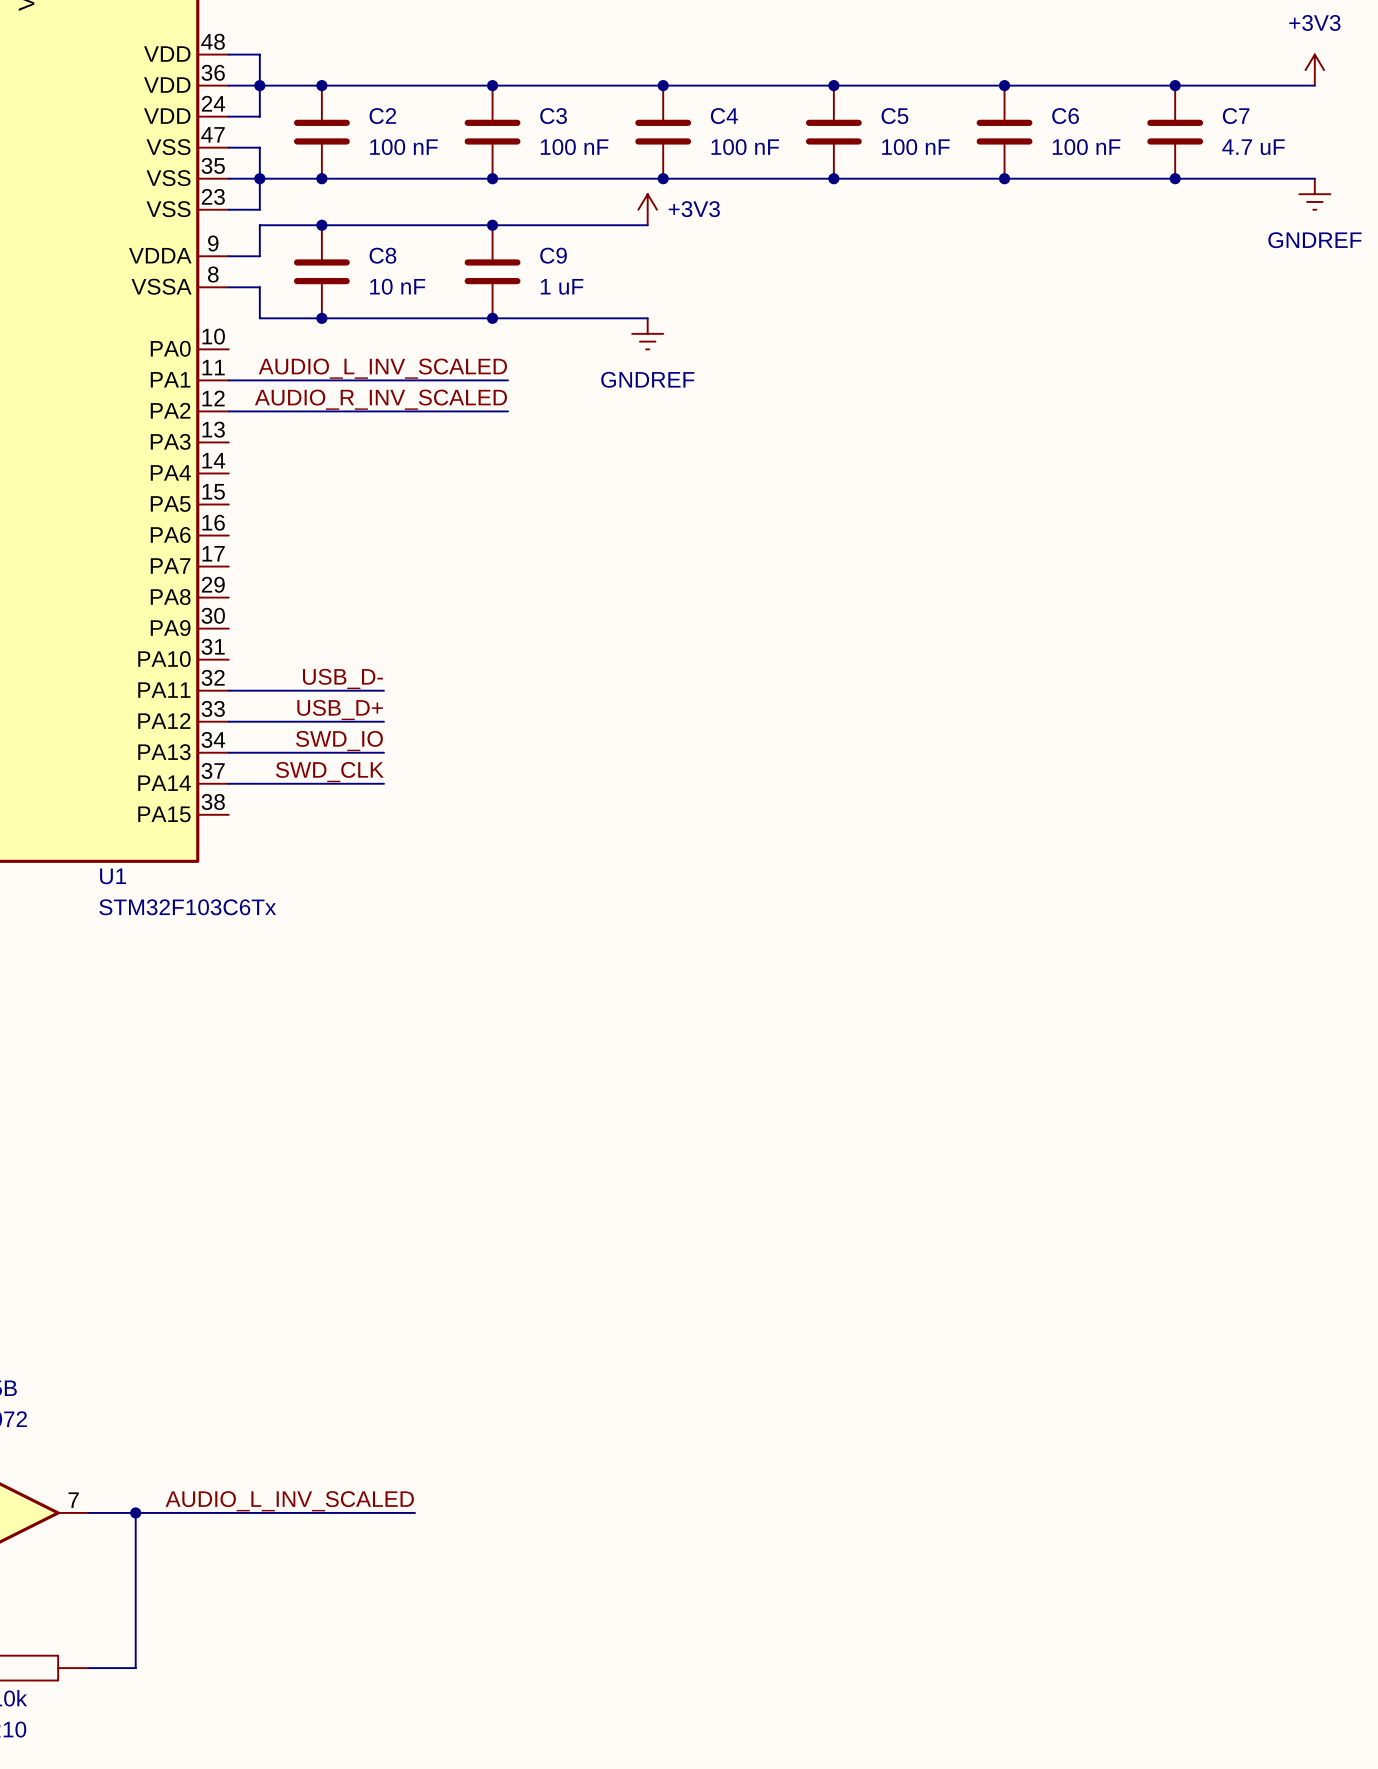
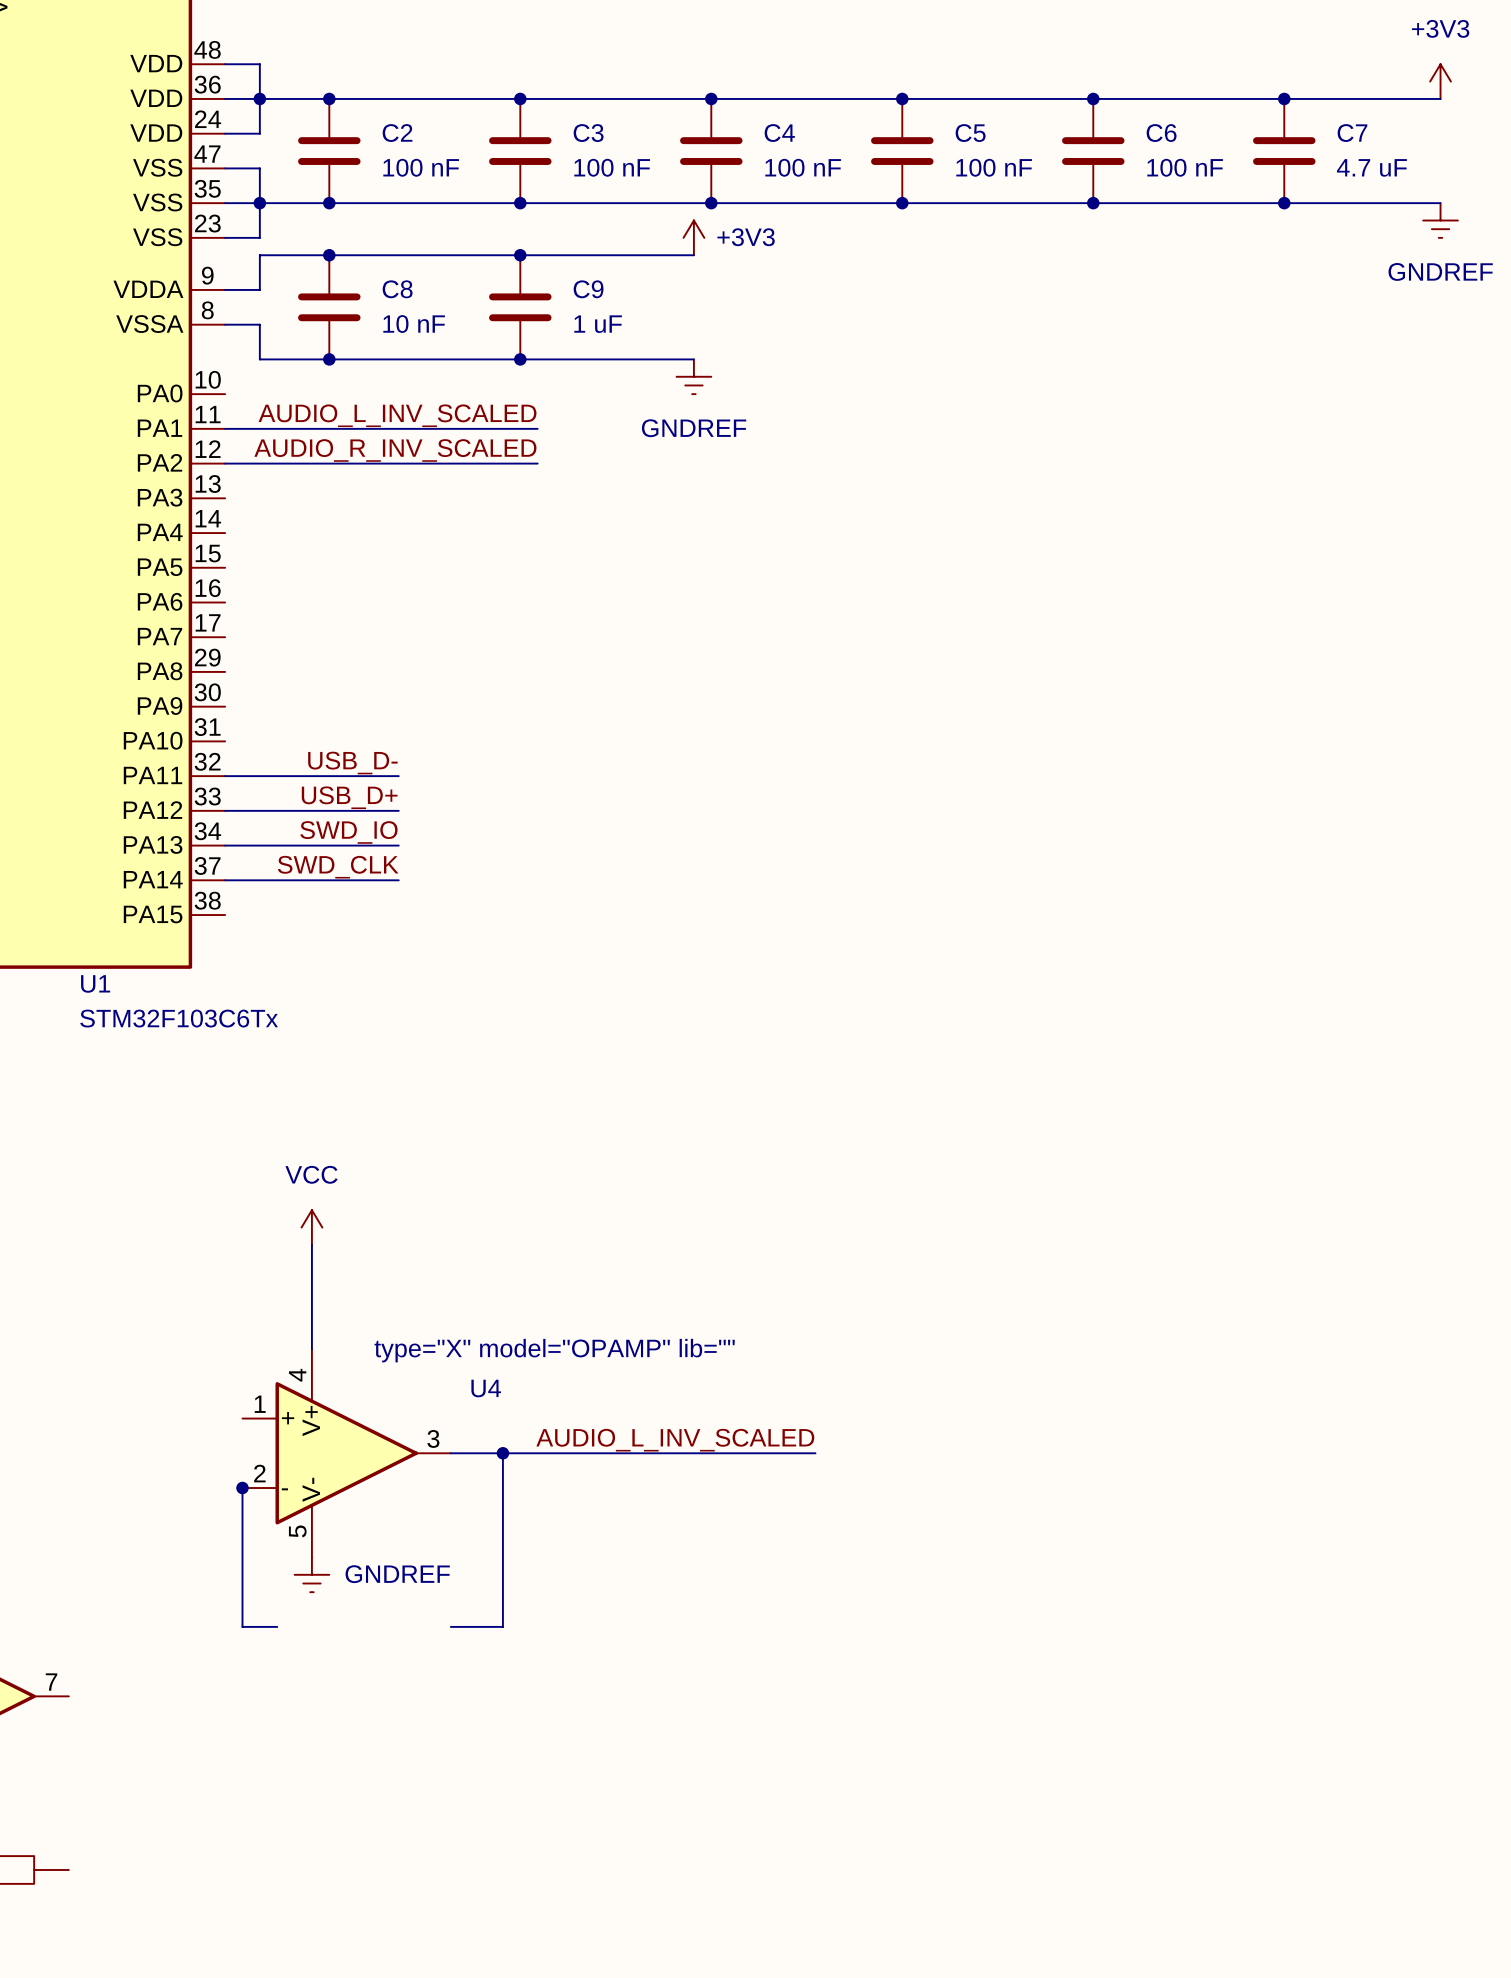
power symbol: none -> VCC (311, 1227)
wire: none -> (311, 1244) (311, 1349)
label: none -> AUDIO_L_INV_SCALED (675, 1440)
U4: none -> type="X" model="OPAMP" lib="" (346, 1453)
wire: none -> (450, 1453) (815, 1453)
wire: none -> (502, 1453) (502, 1626) (450, 1626)
junction: none -> (502, 1453)
wire: none -> (242, 1488) (242, 1626) (277, 1626)
junction: none -> (242, 1488)
power symbol: none -> GNDREF (311, 1574)
label: AUDIO_L_INV_SCALED (289, 1501) -> none
wire: (89, 1512) (414, 1512) -> none
wire: (135, 1512) (135, 1668) (89, 1668) -> none
junction: (135, 1512) -> none

